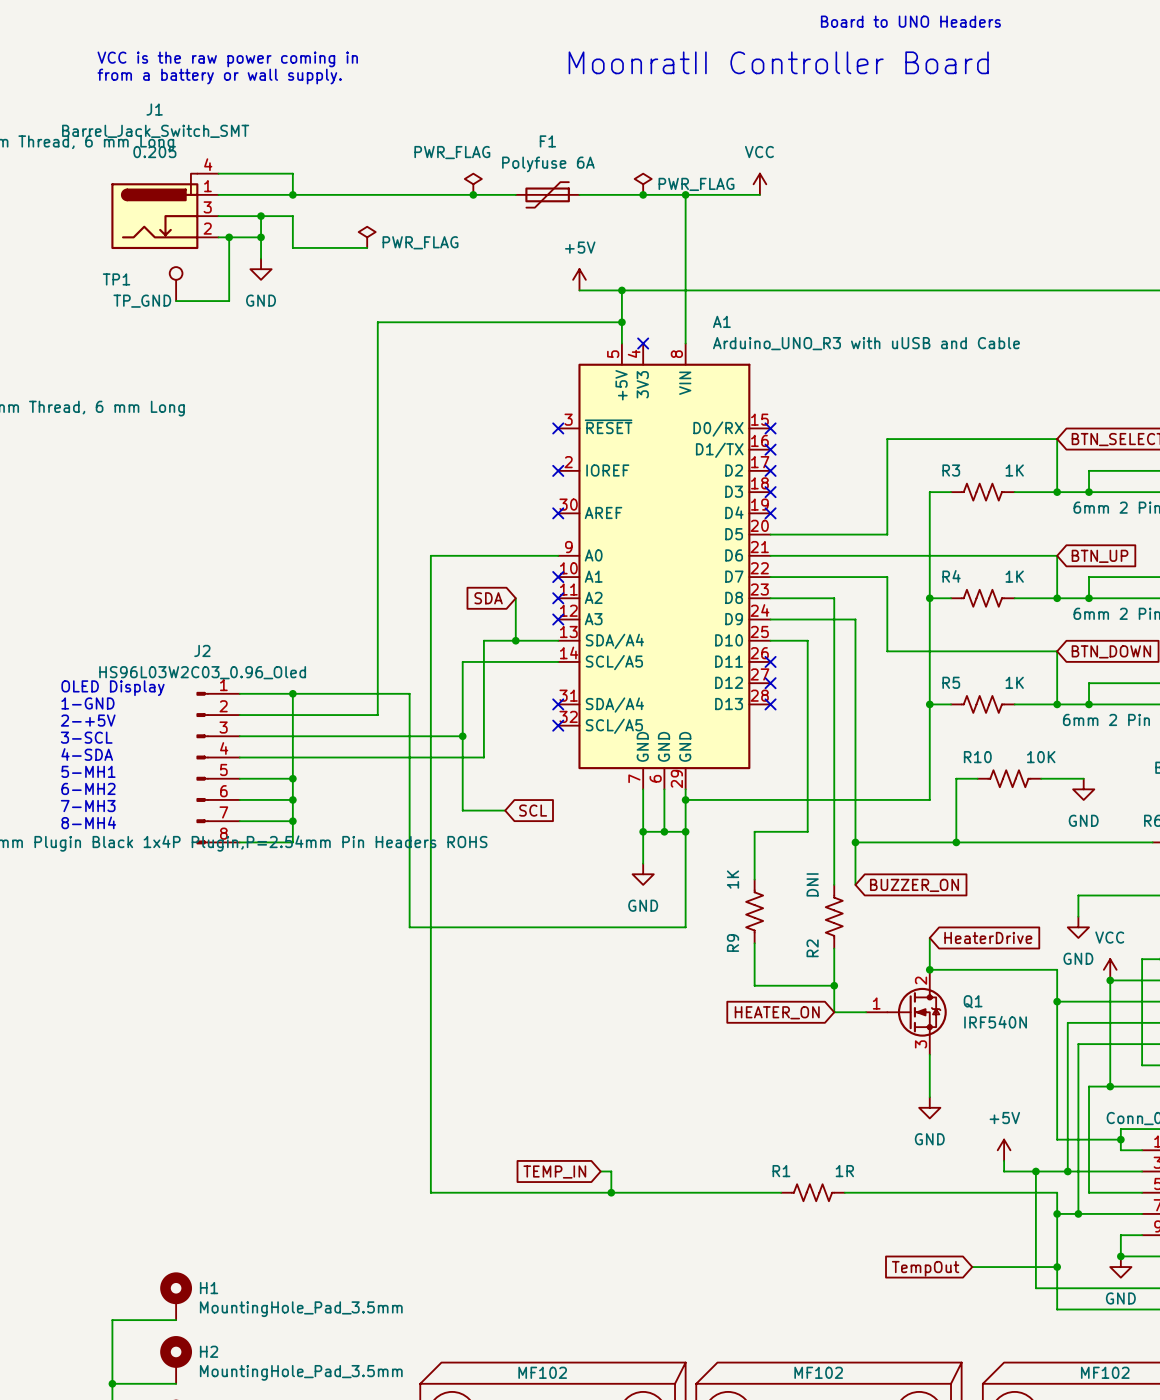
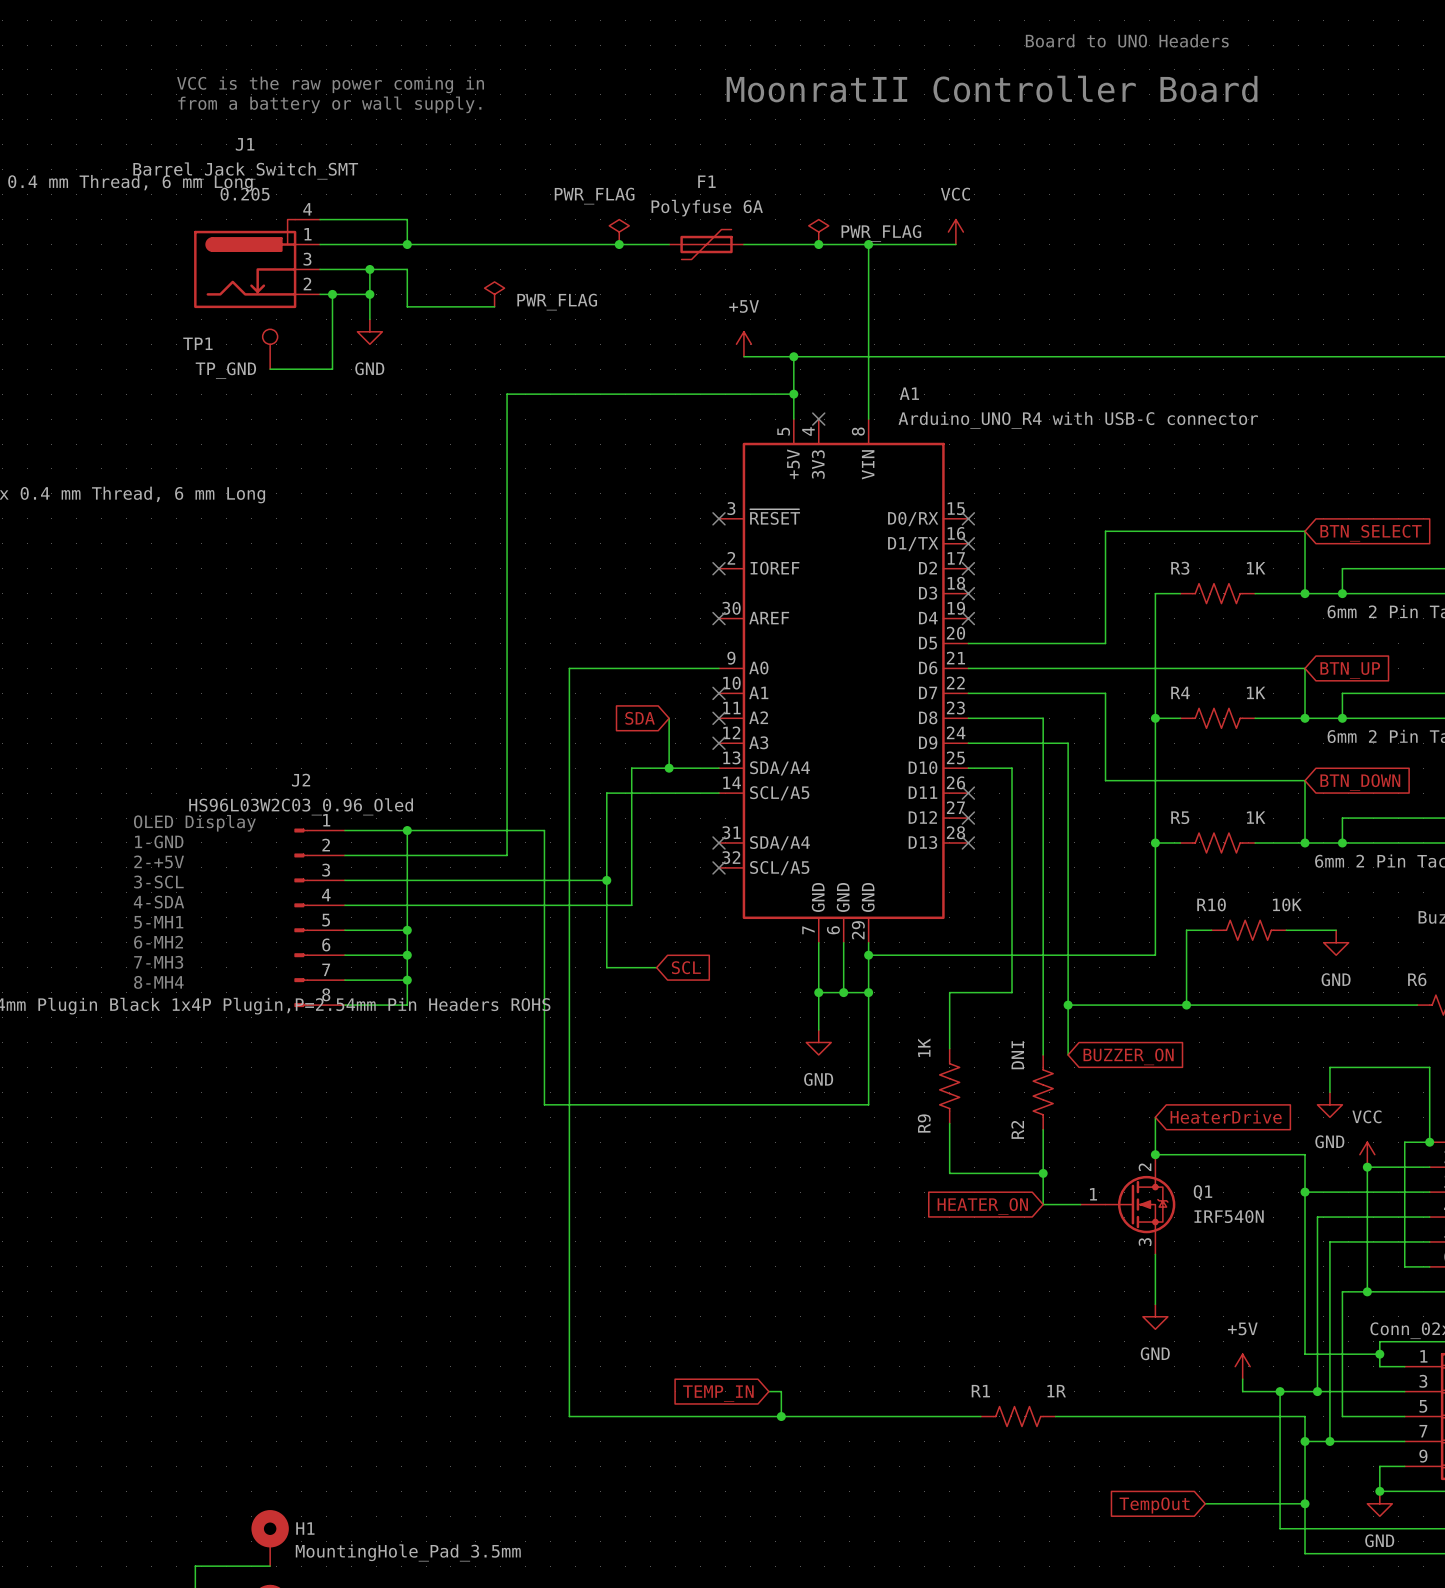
A1 value: Arduino_UNO_R3 with uUSB and Cable (866, 343) -> Arduino_UNO_R4 with USB-C connector (1078, 420)

